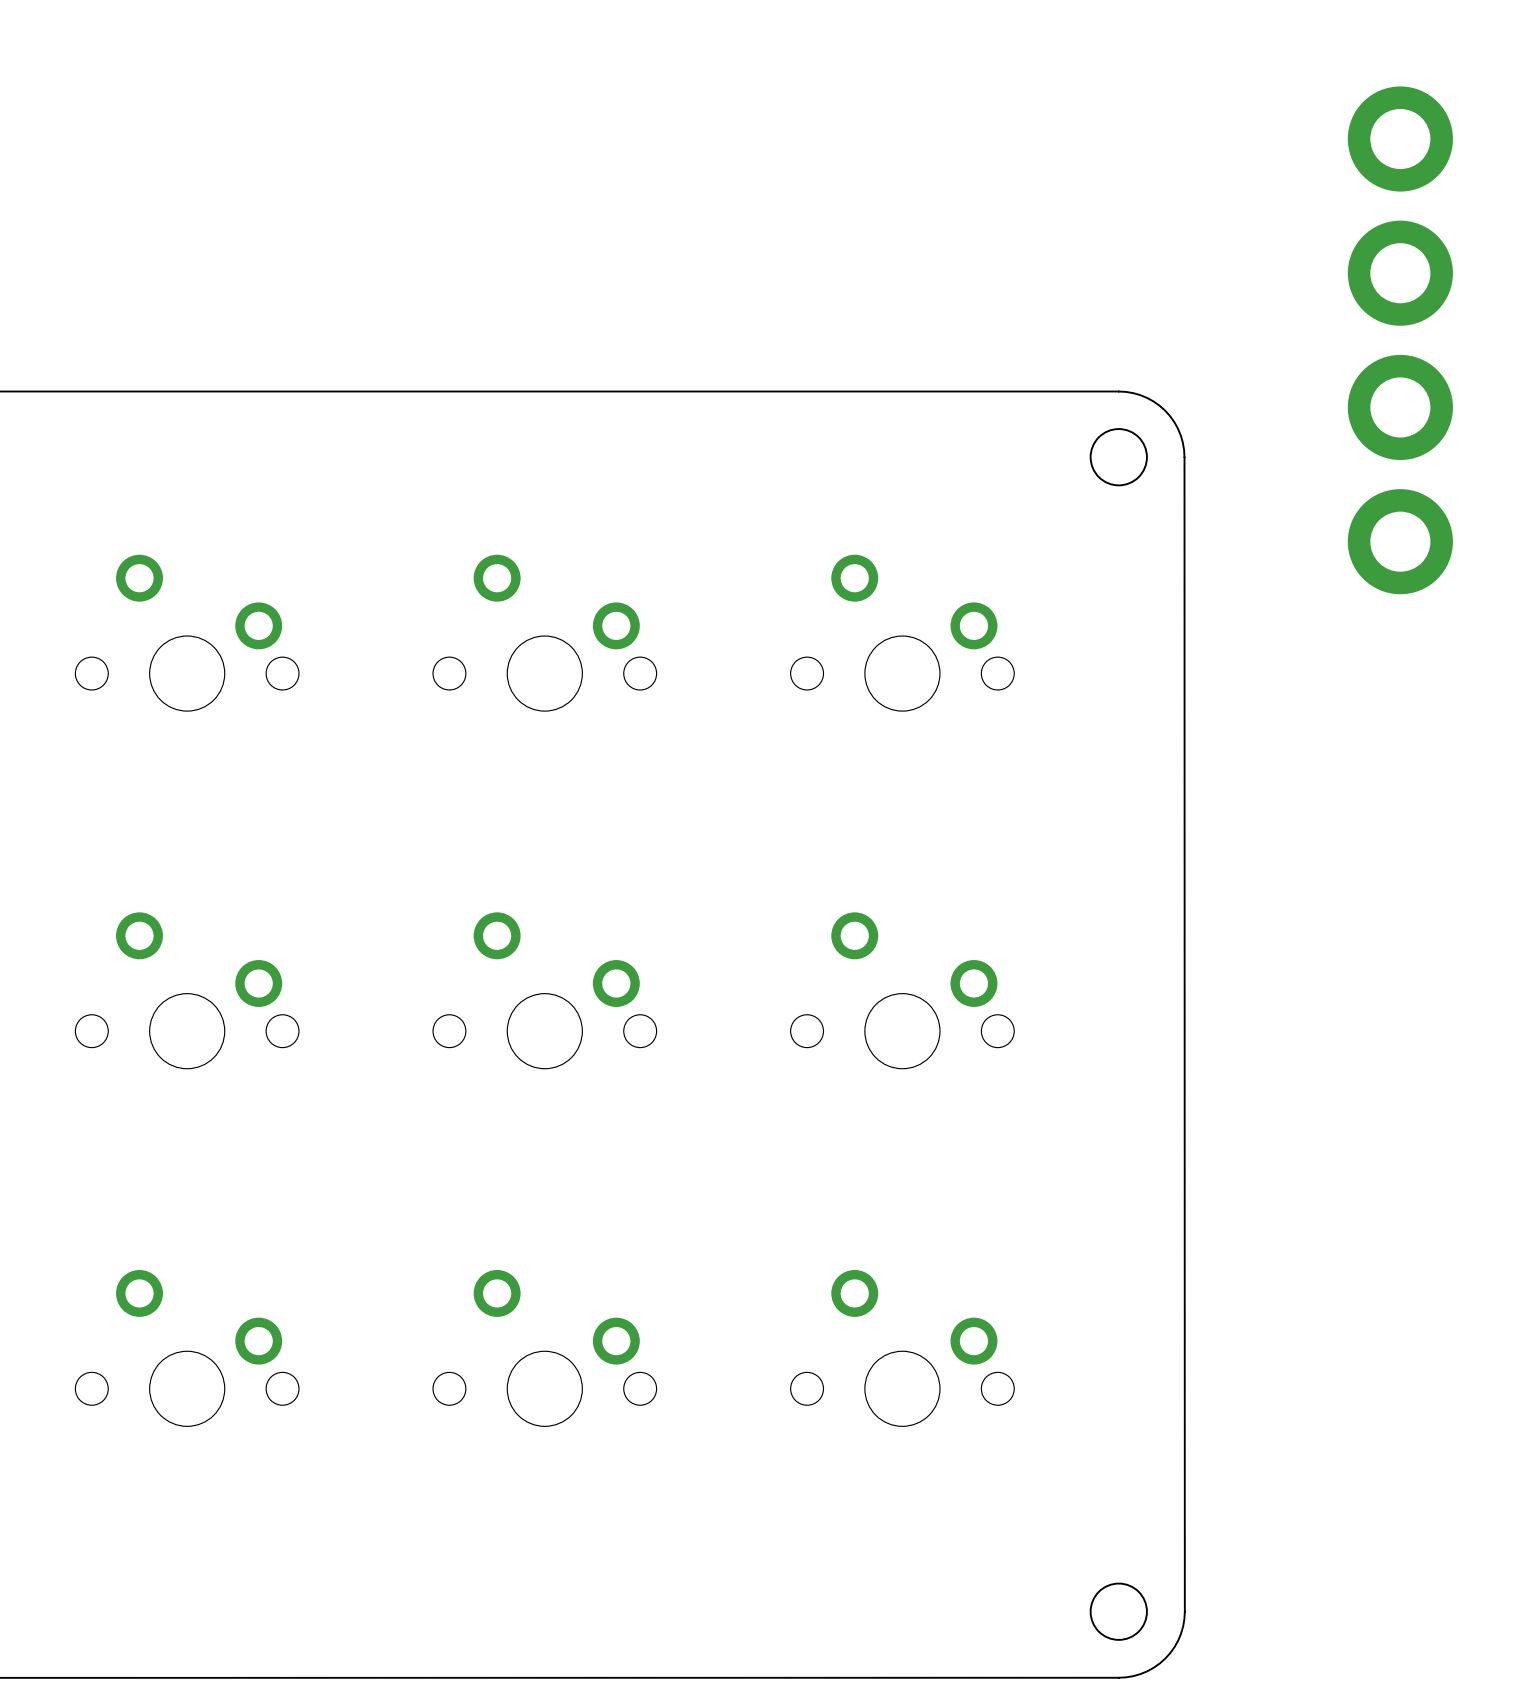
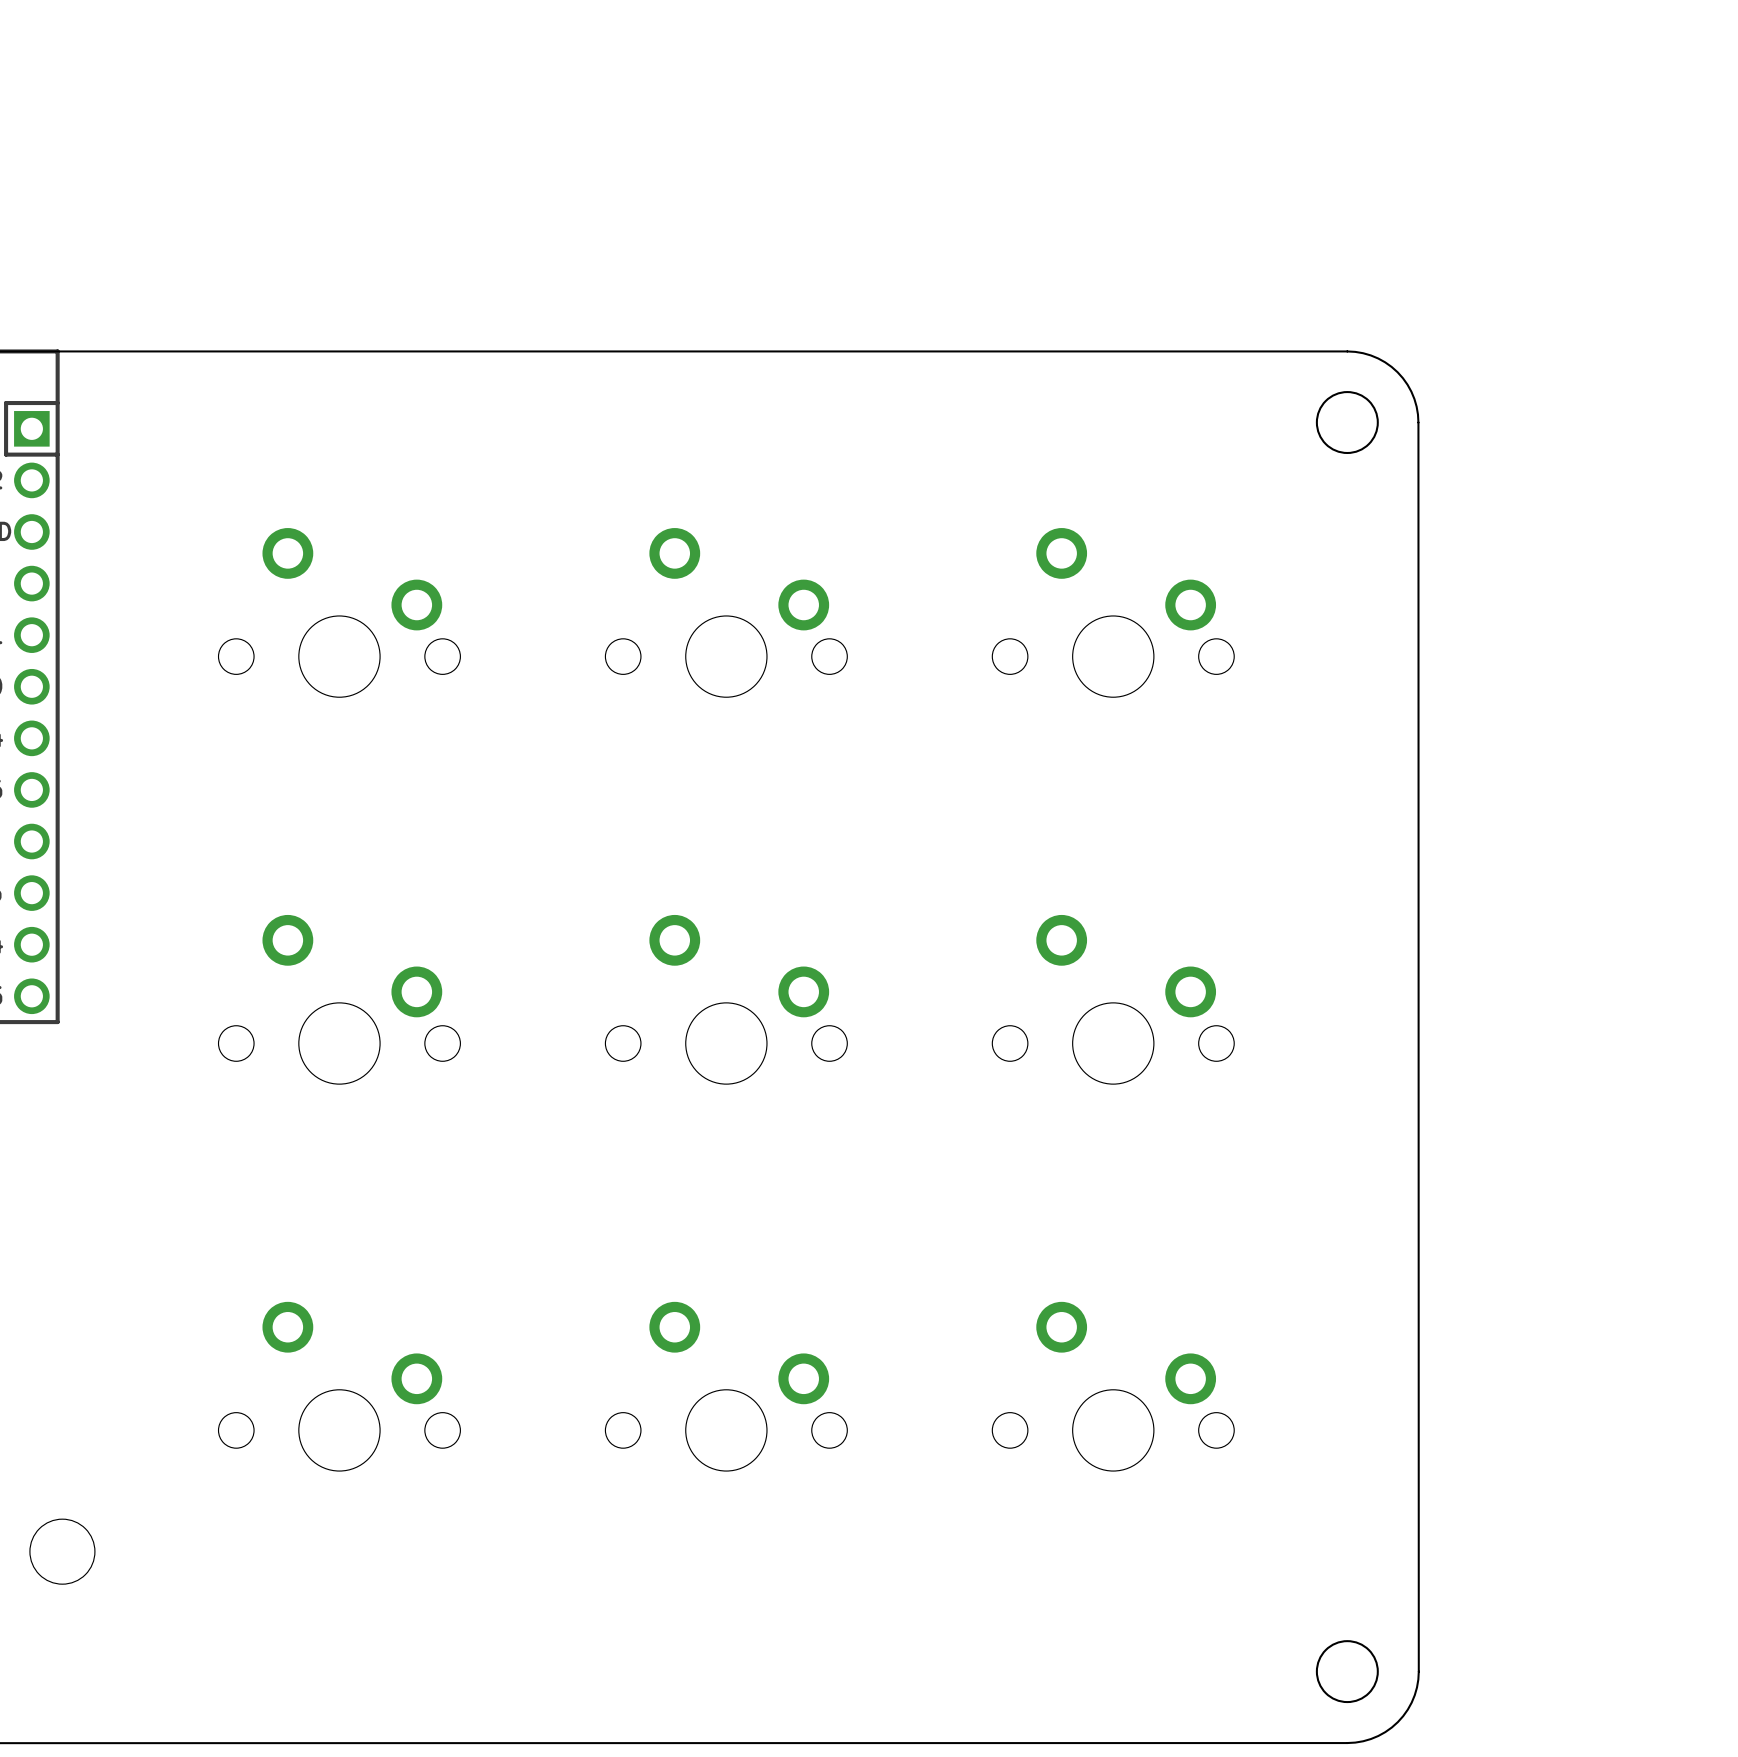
part: (1400, 139) -> none
part: (1400, 273) -> none
part: (1400, 407) -> none
part: (1400, 541) -> none

